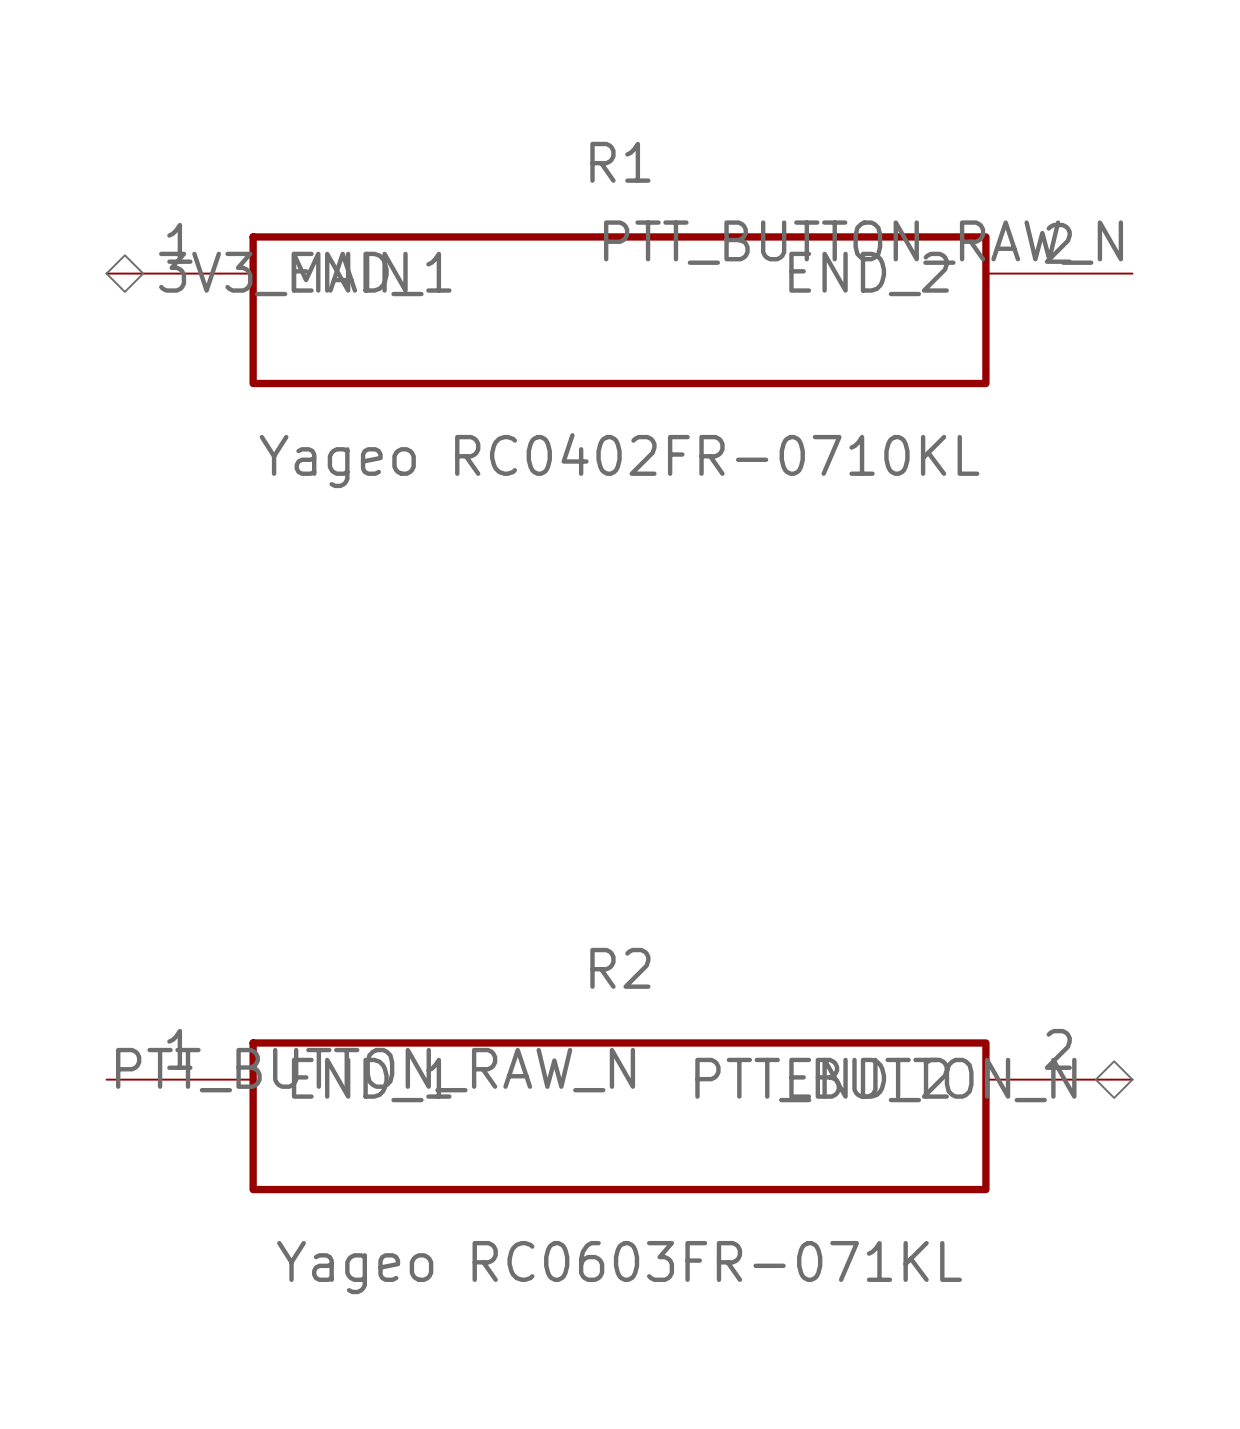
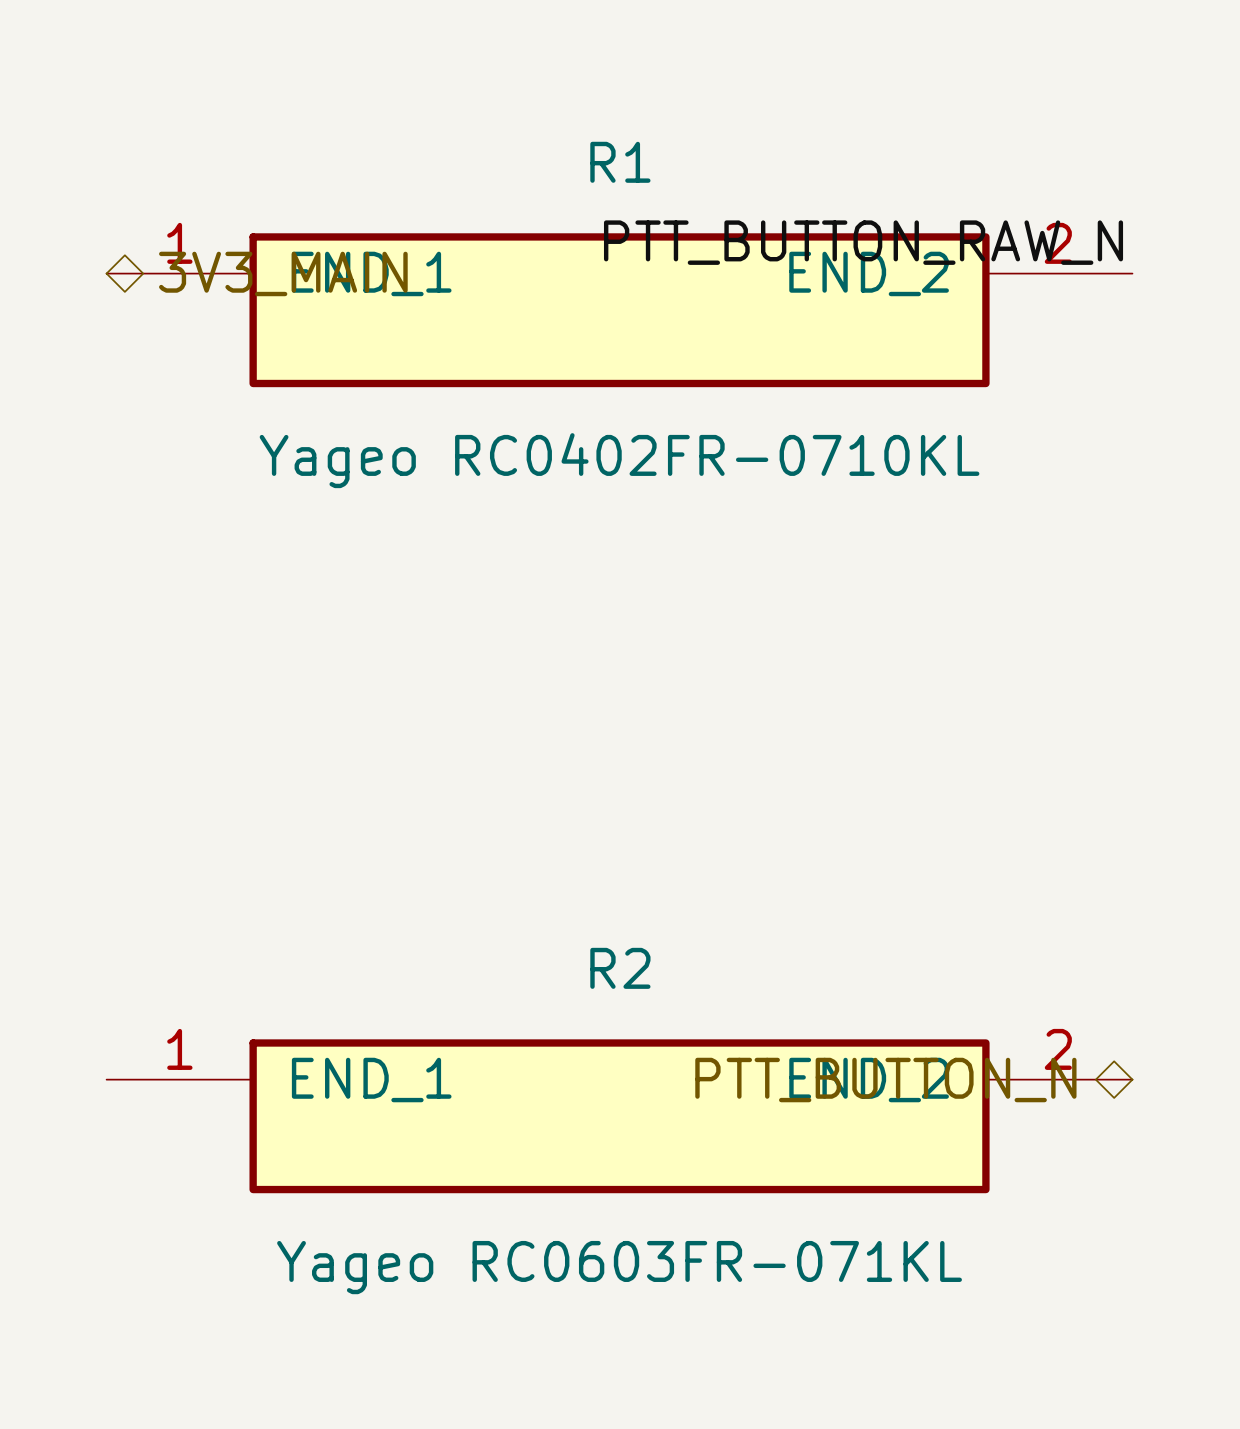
label: PTT_BUTTON_RAW_N (375, 1070) -> none

